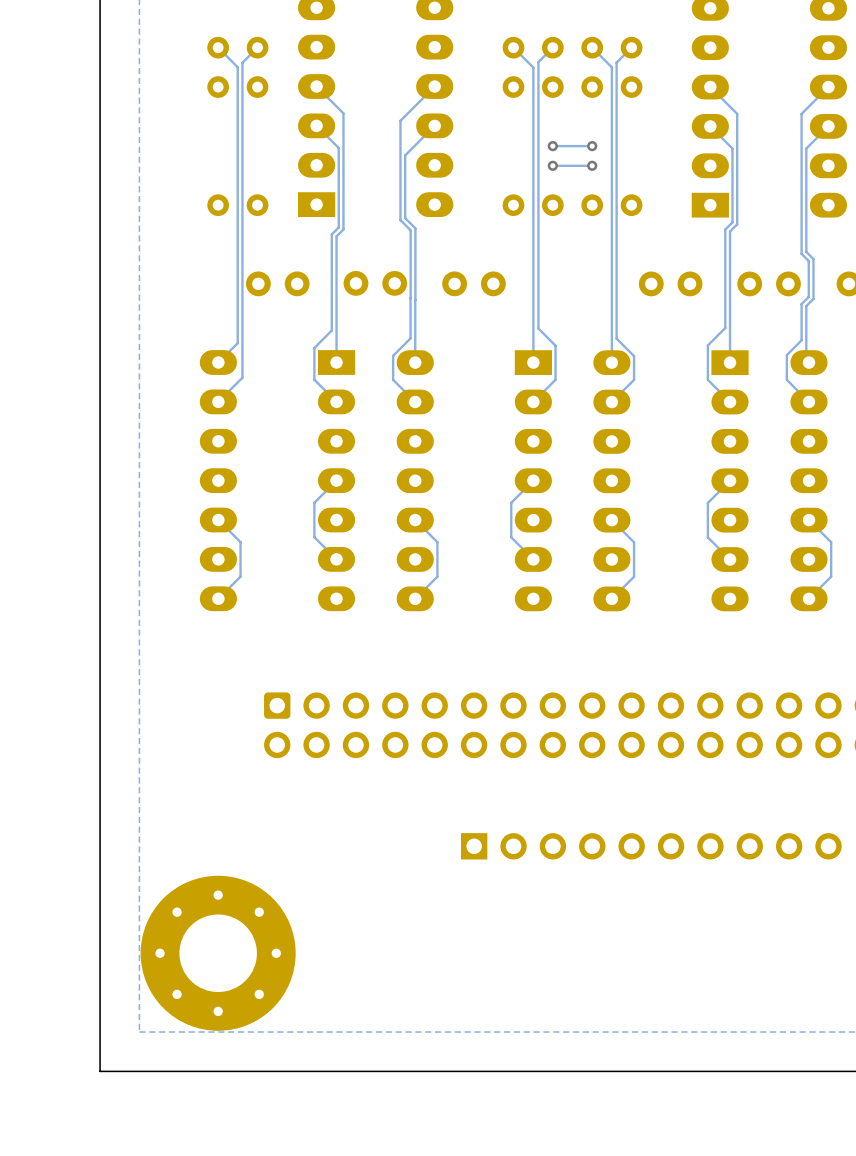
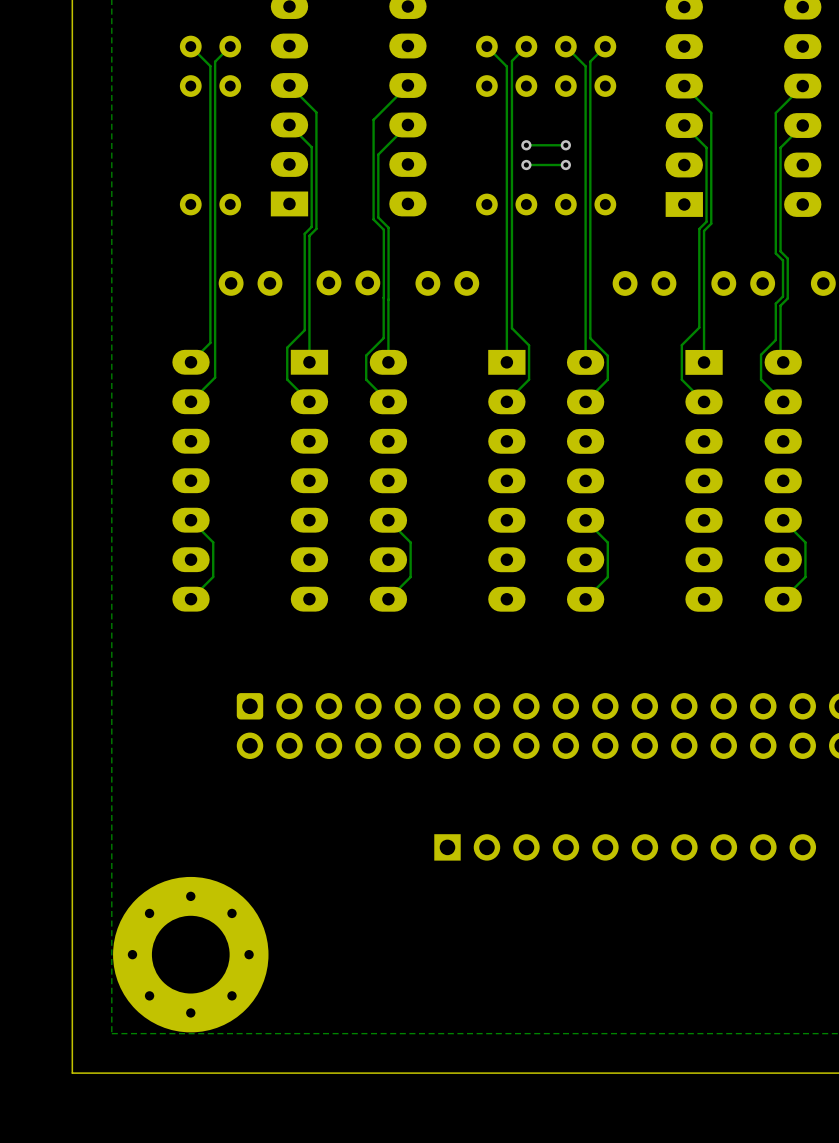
track: (336, 480) (314, 502) (314, 537) (336, 559) -> none
track: (533, 480) (511, 502) (511, 537) (533, 559) -> none
track: (730, 480) (707, 502) (707, 537) (730, 559) -> none

